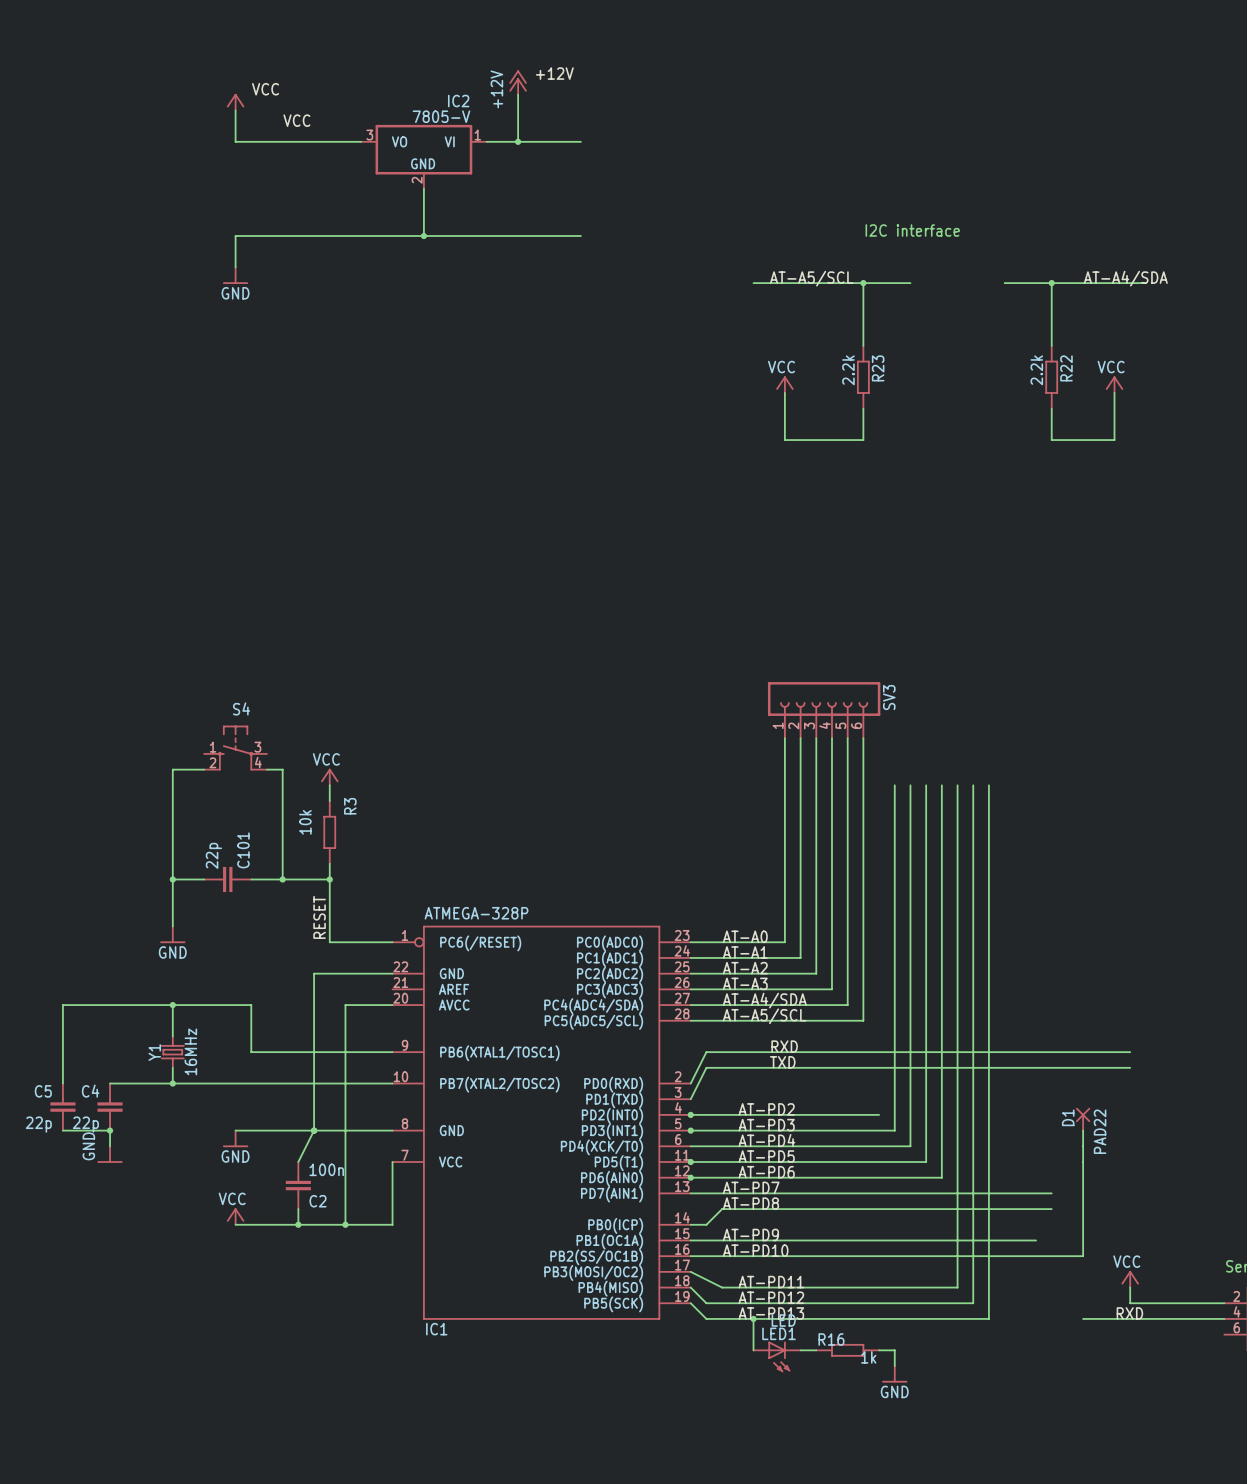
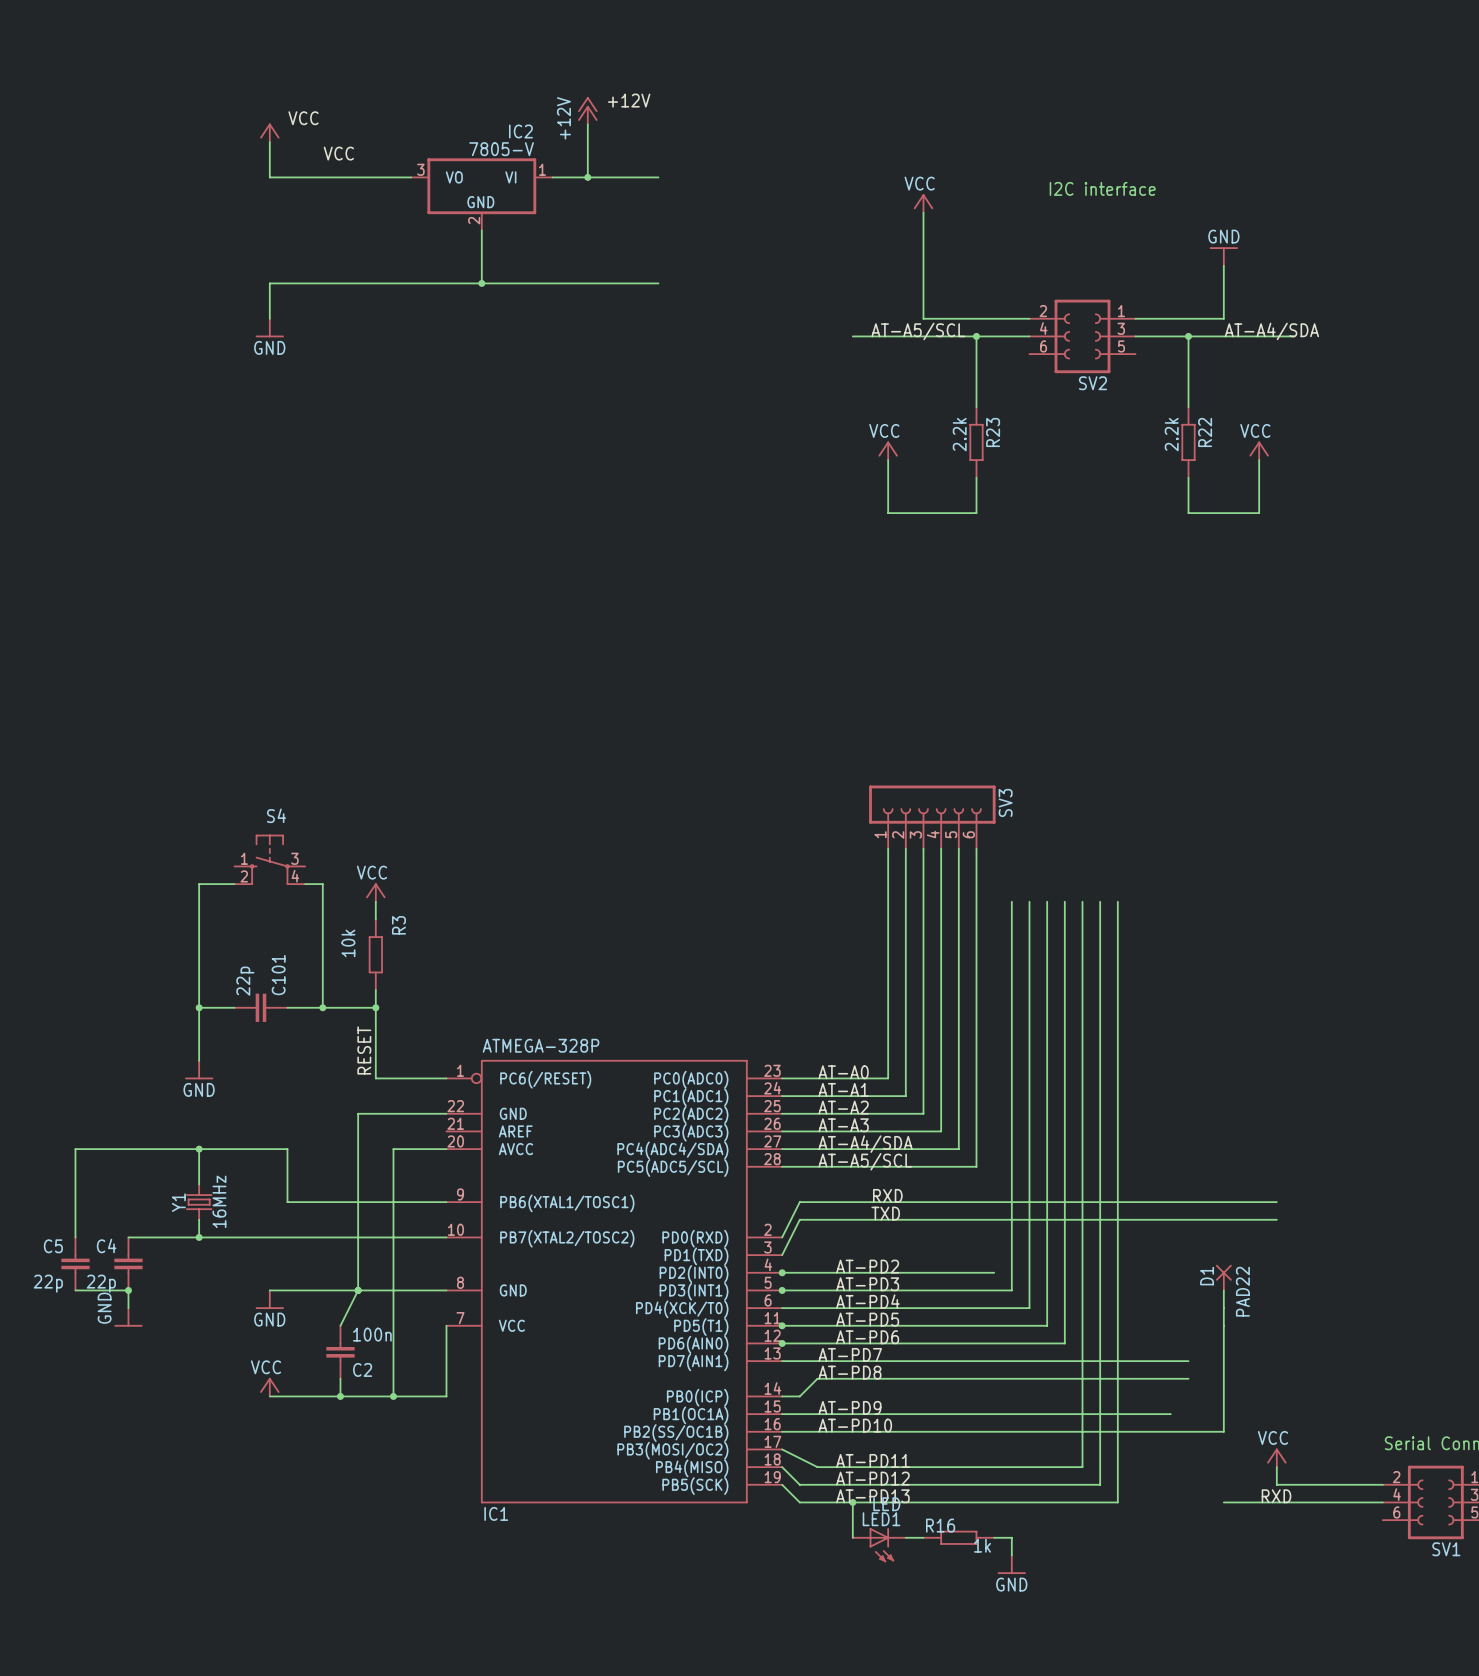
power symbol: none -> VCC (923, 203)
wire: none -> (923, 212) (923, 318) (1029, 318)
power symbol: none -> GND (1223, 256)
wire: none -> (1223, 265) (1223, 318) (1135, 318)
text position: I2C interface (912, 230) -> I2C interface (1102, 188)
SV2: none -> (1082, 336)

